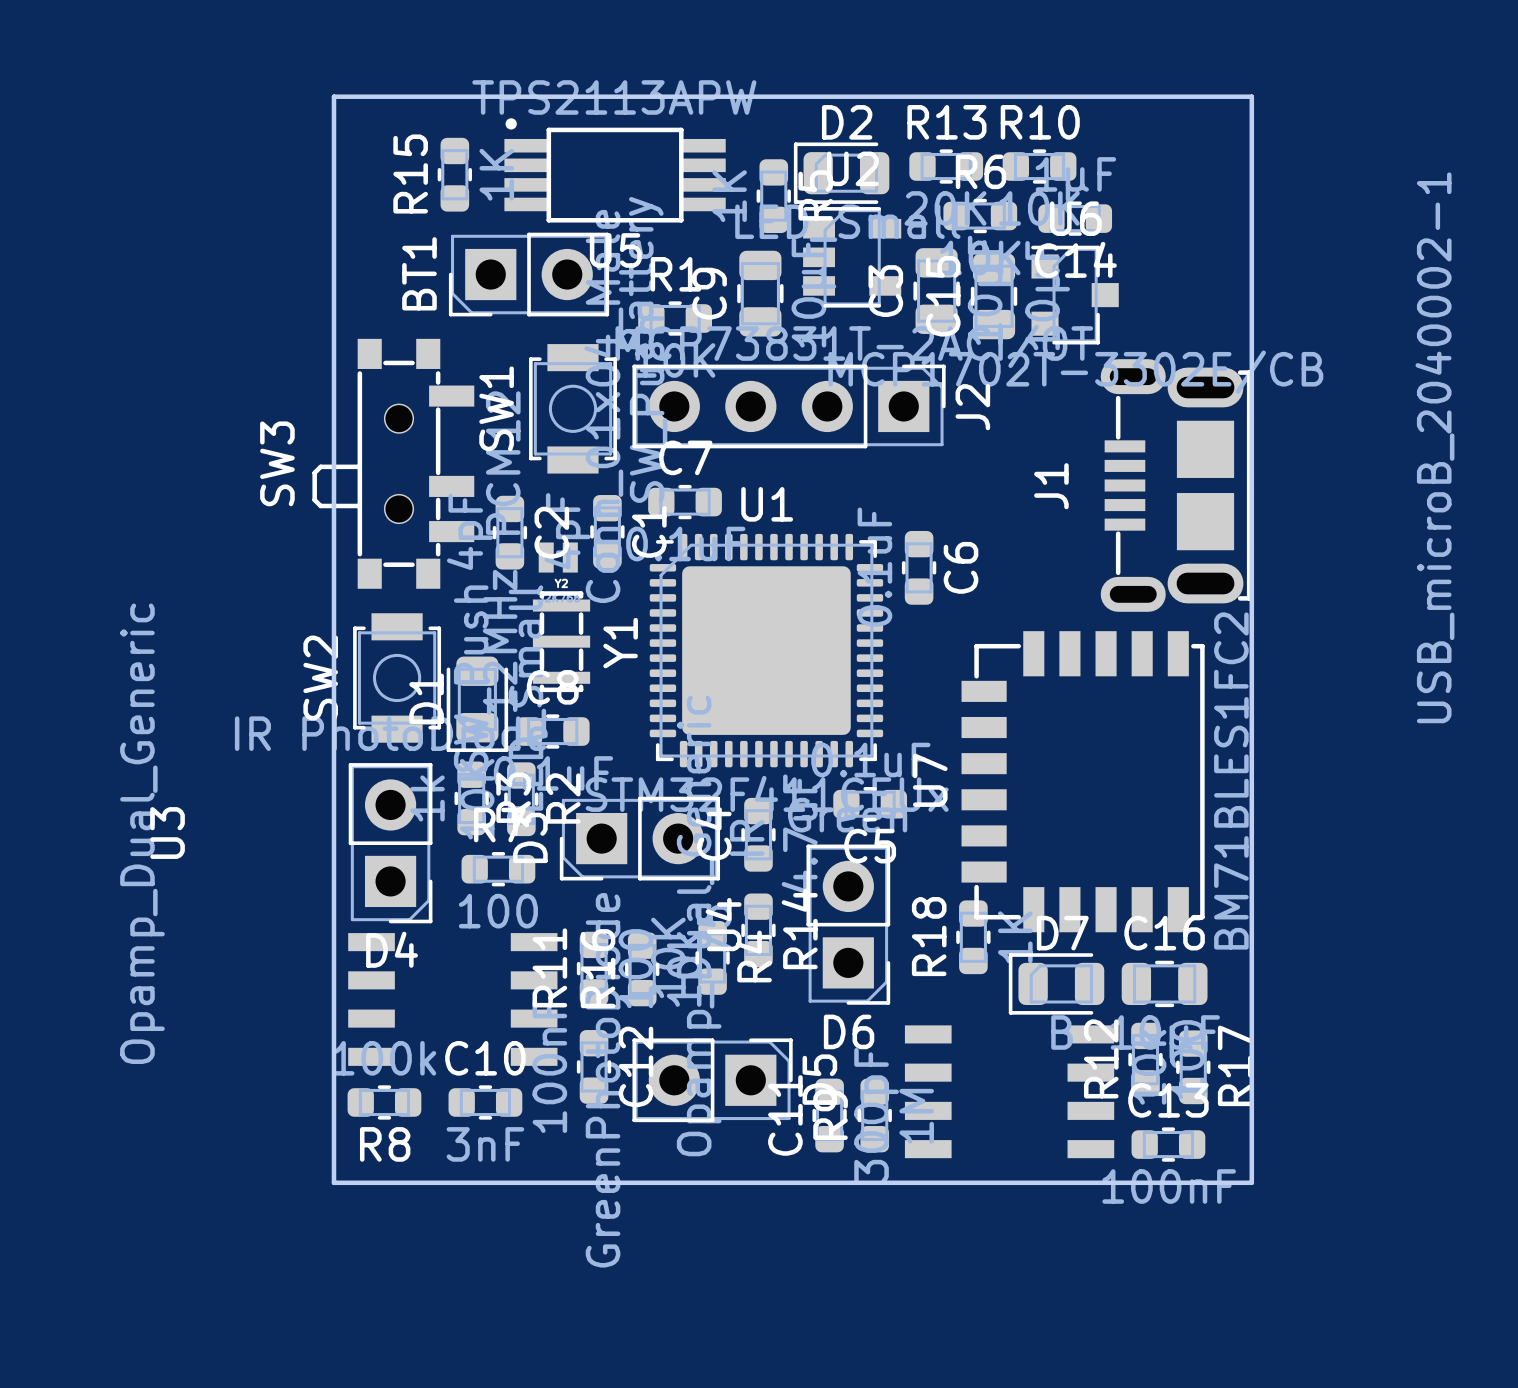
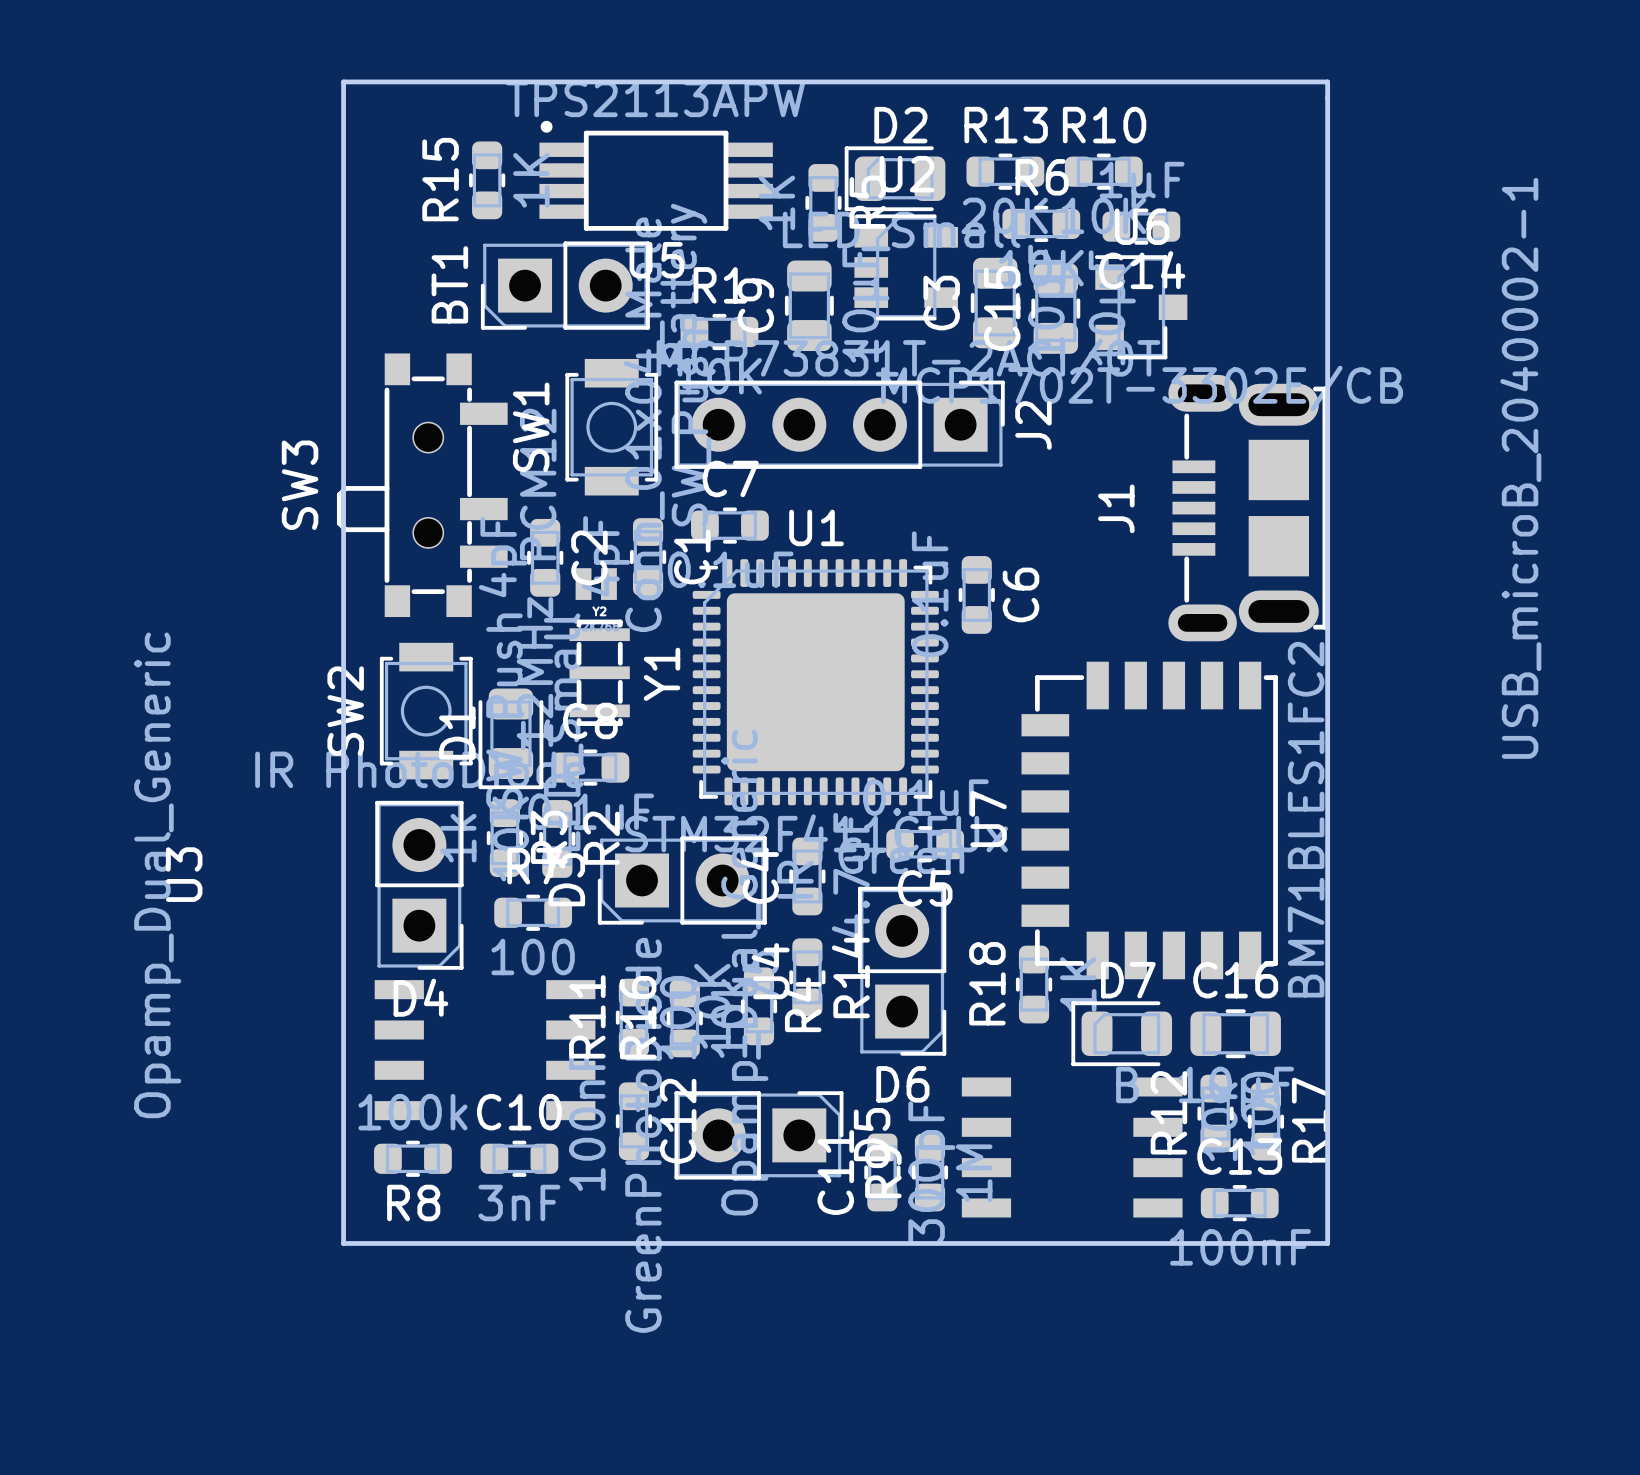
board edge: (1251, 96) (333, 96) (333, 1182) -> (1327, 98) (1327, 81) (343, 81) (343, 1243) (359, 1243)

